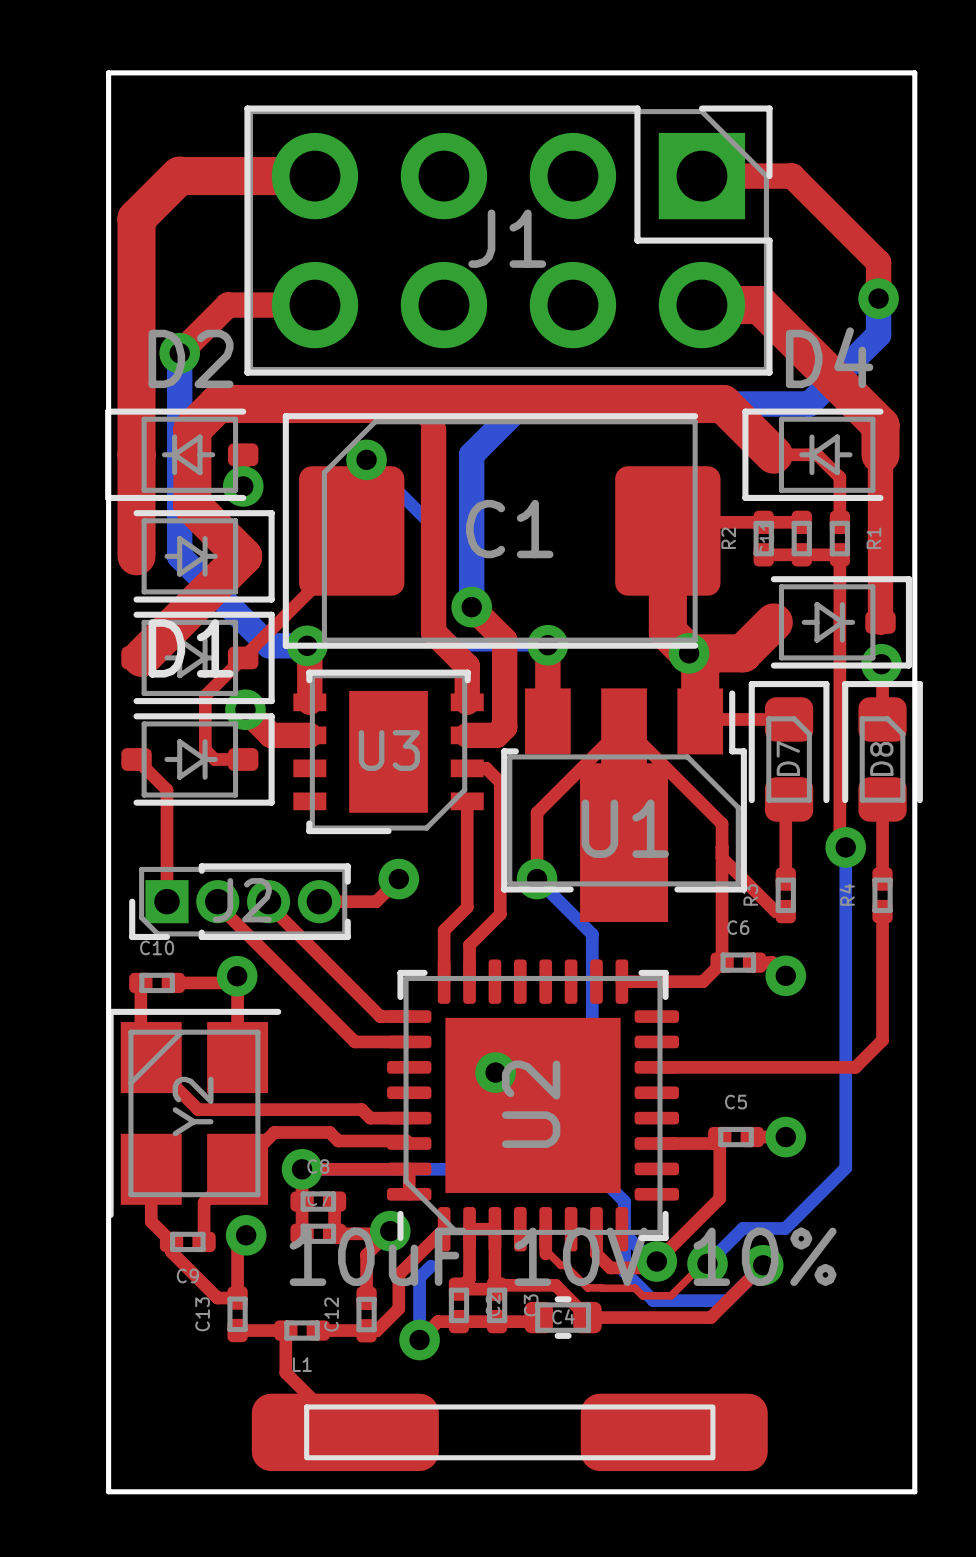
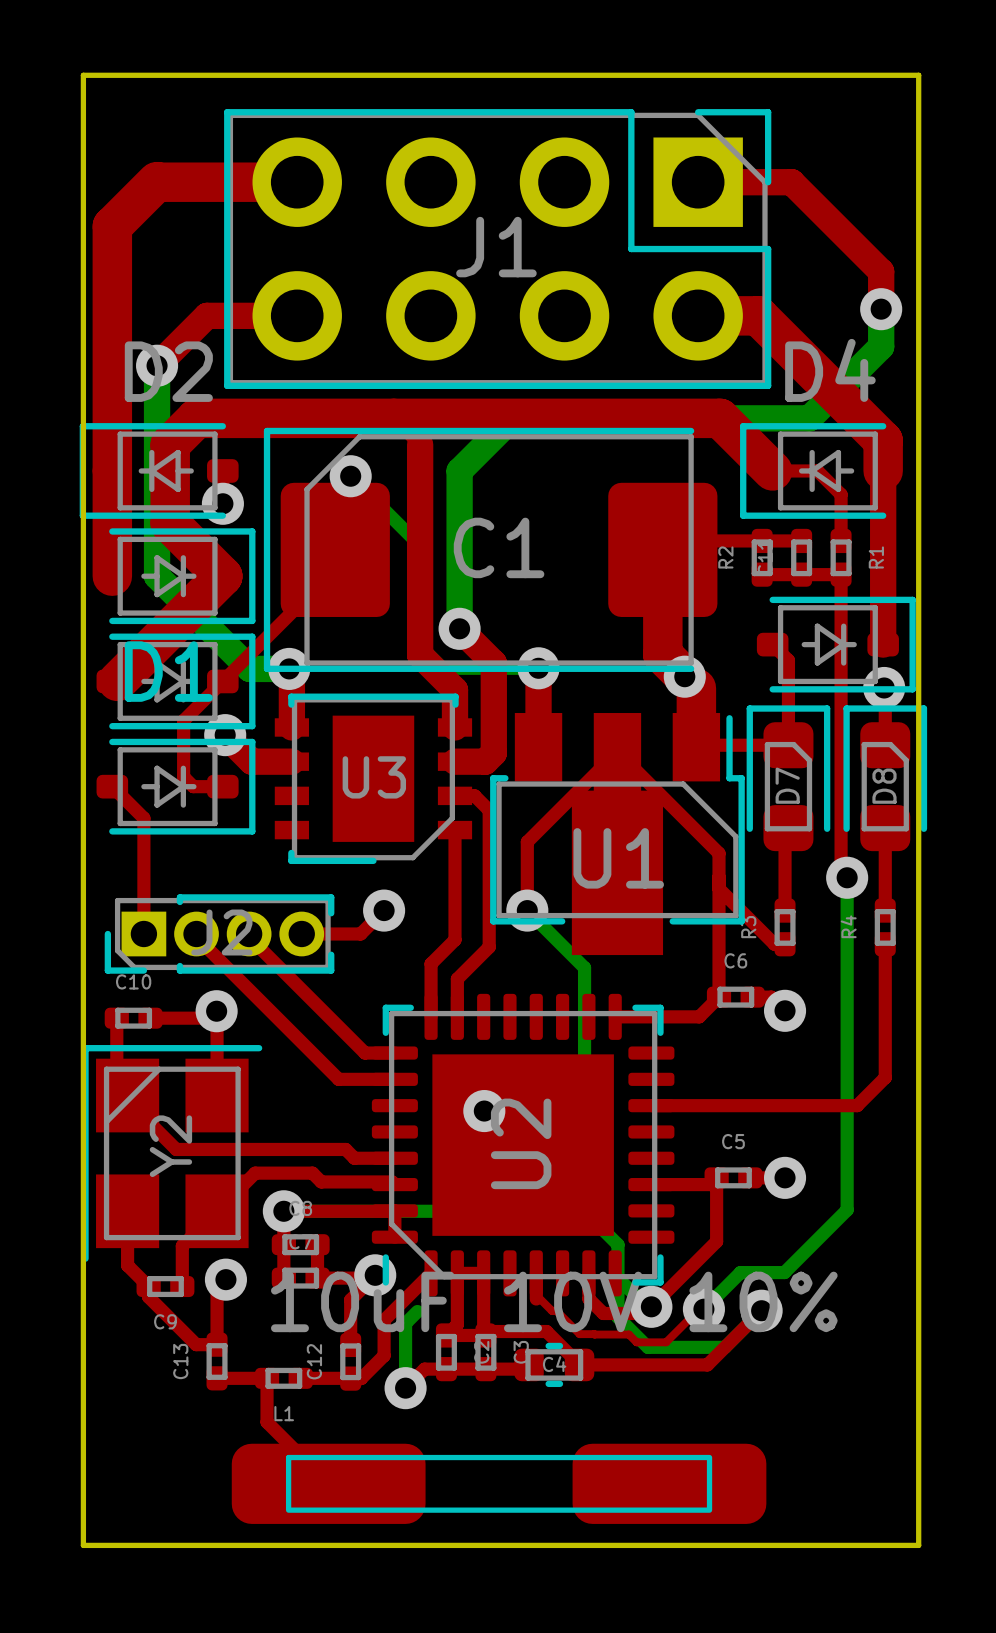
top track: (773, 622) (742, 653) (689, 653) -> (772, 644) (788, 660) (788, 745)

